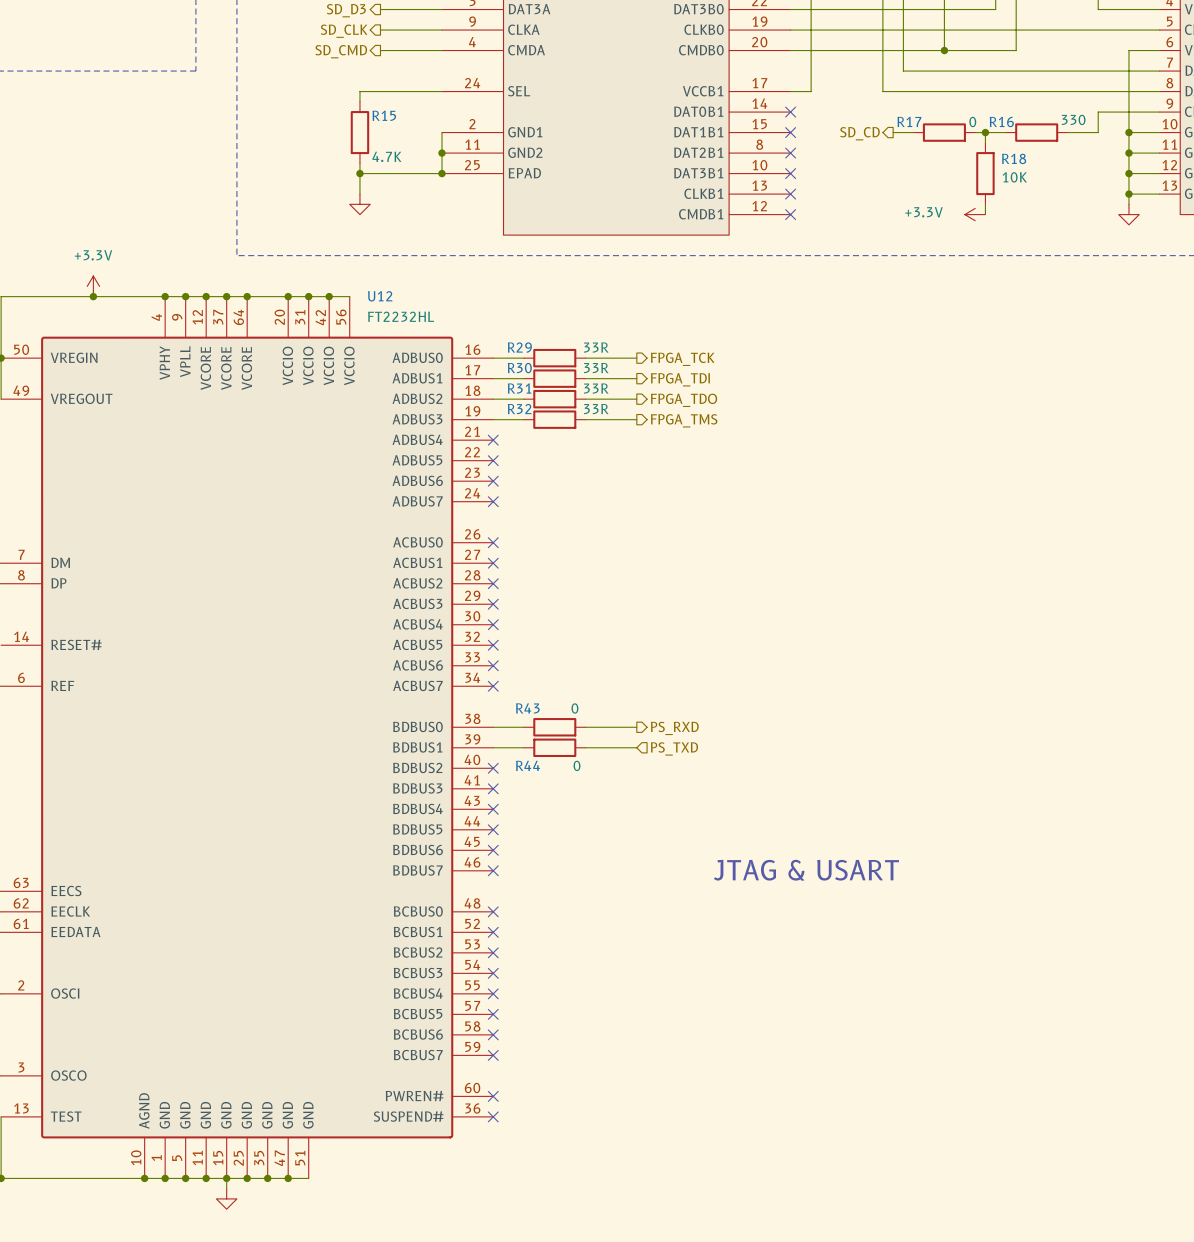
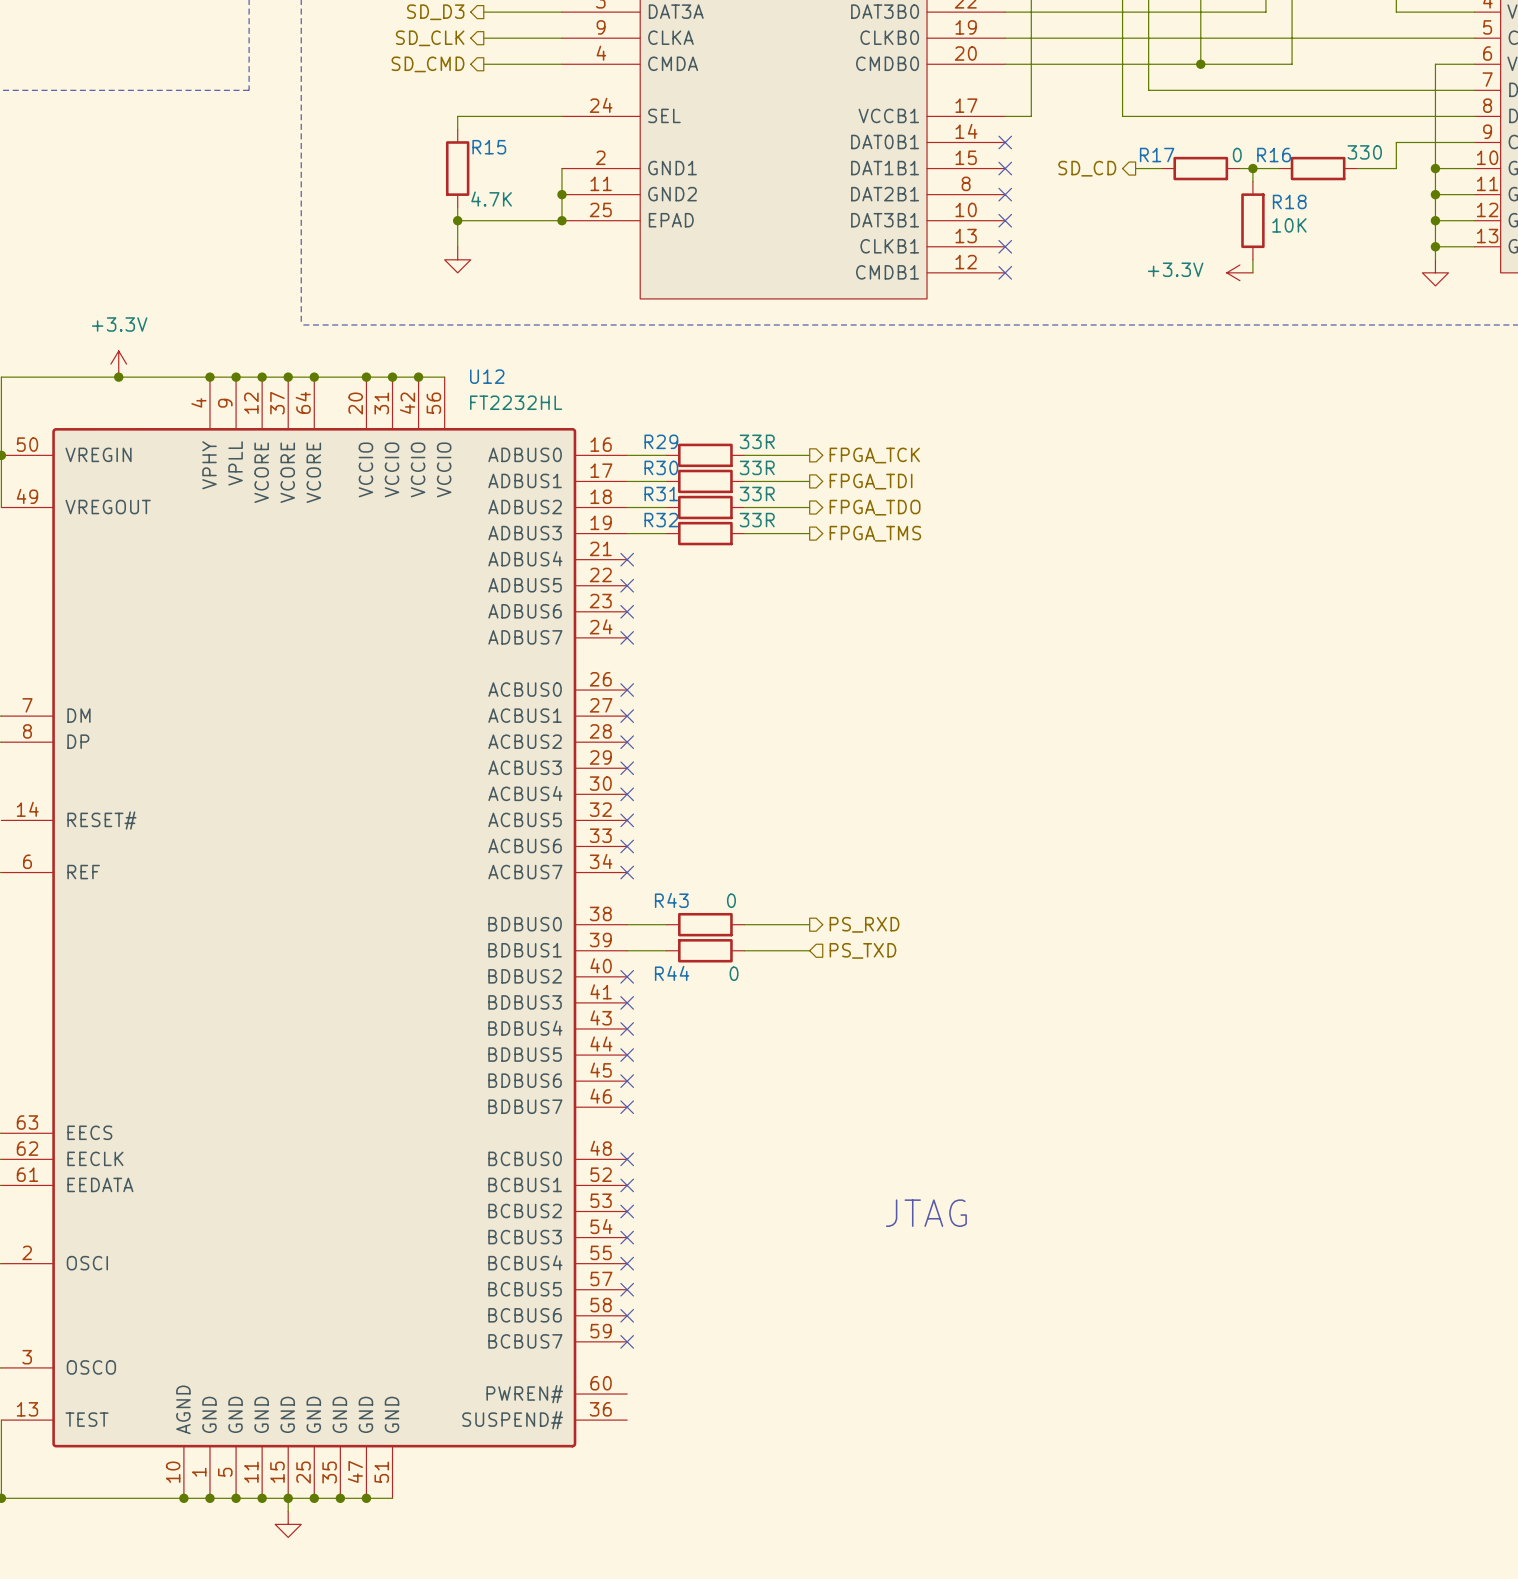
text: JTAG & USART (806, 870) -> none
text: none -> JTAG (926, 1213)
no-connect mark: (493, 1096) -> none
no-connect mark: (493, 1116) -> none

